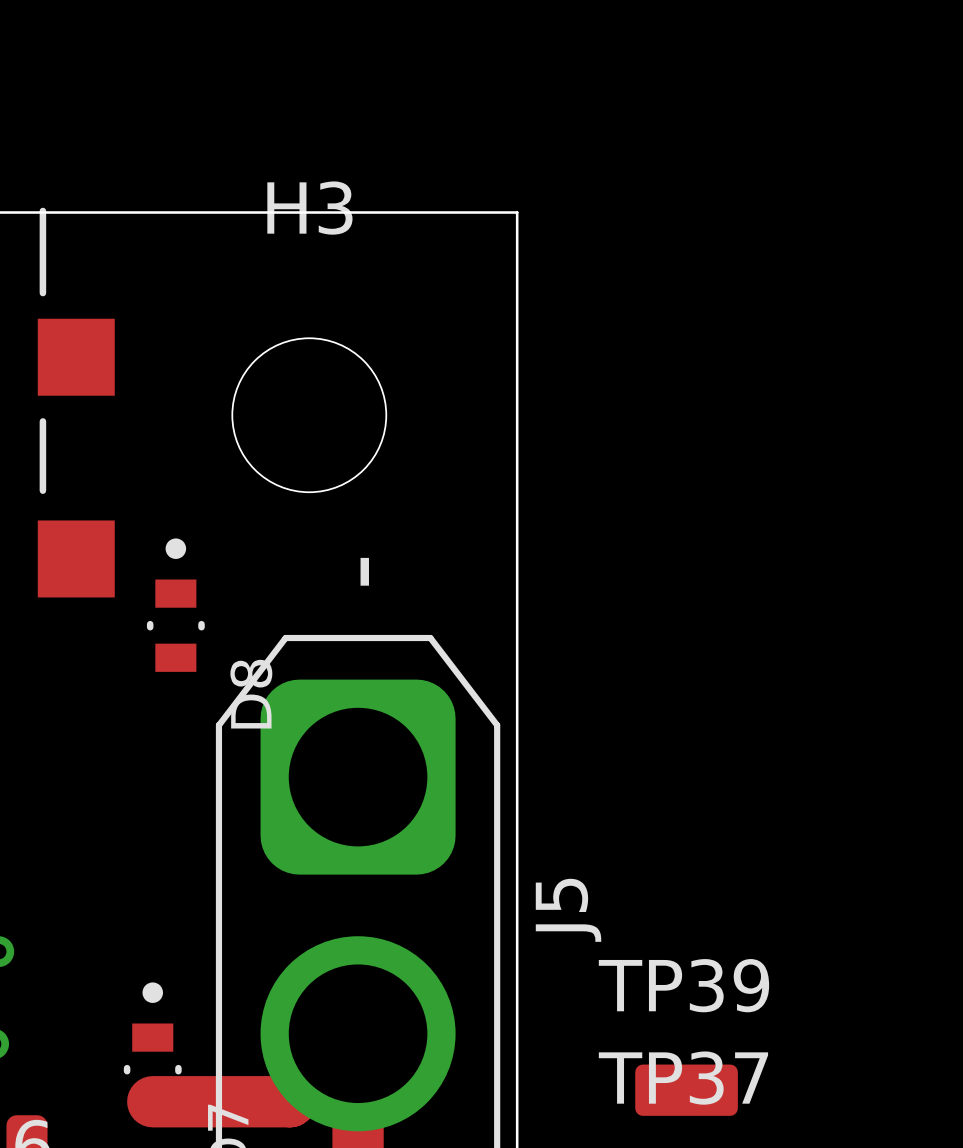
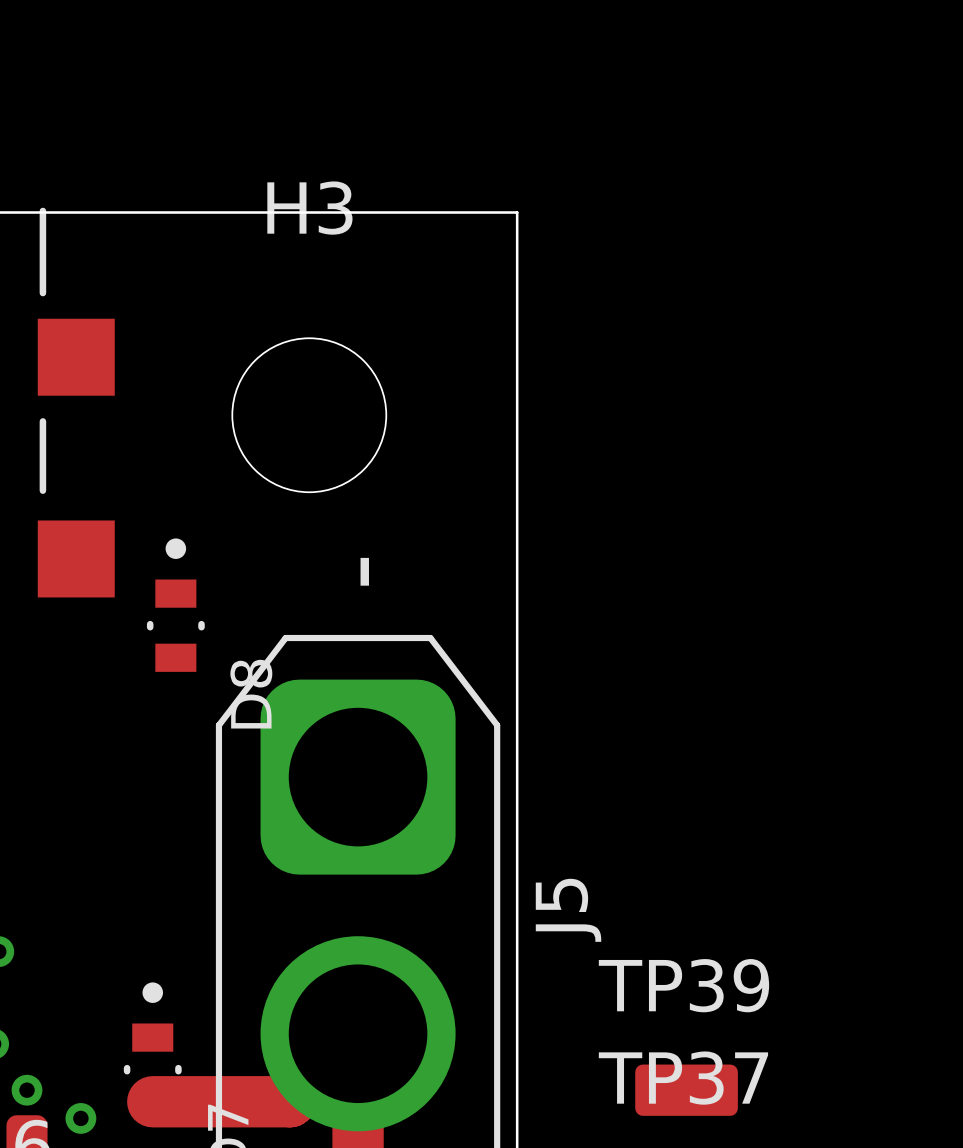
via: none -> (27, 1090)
via: none -> (80, 1118)

